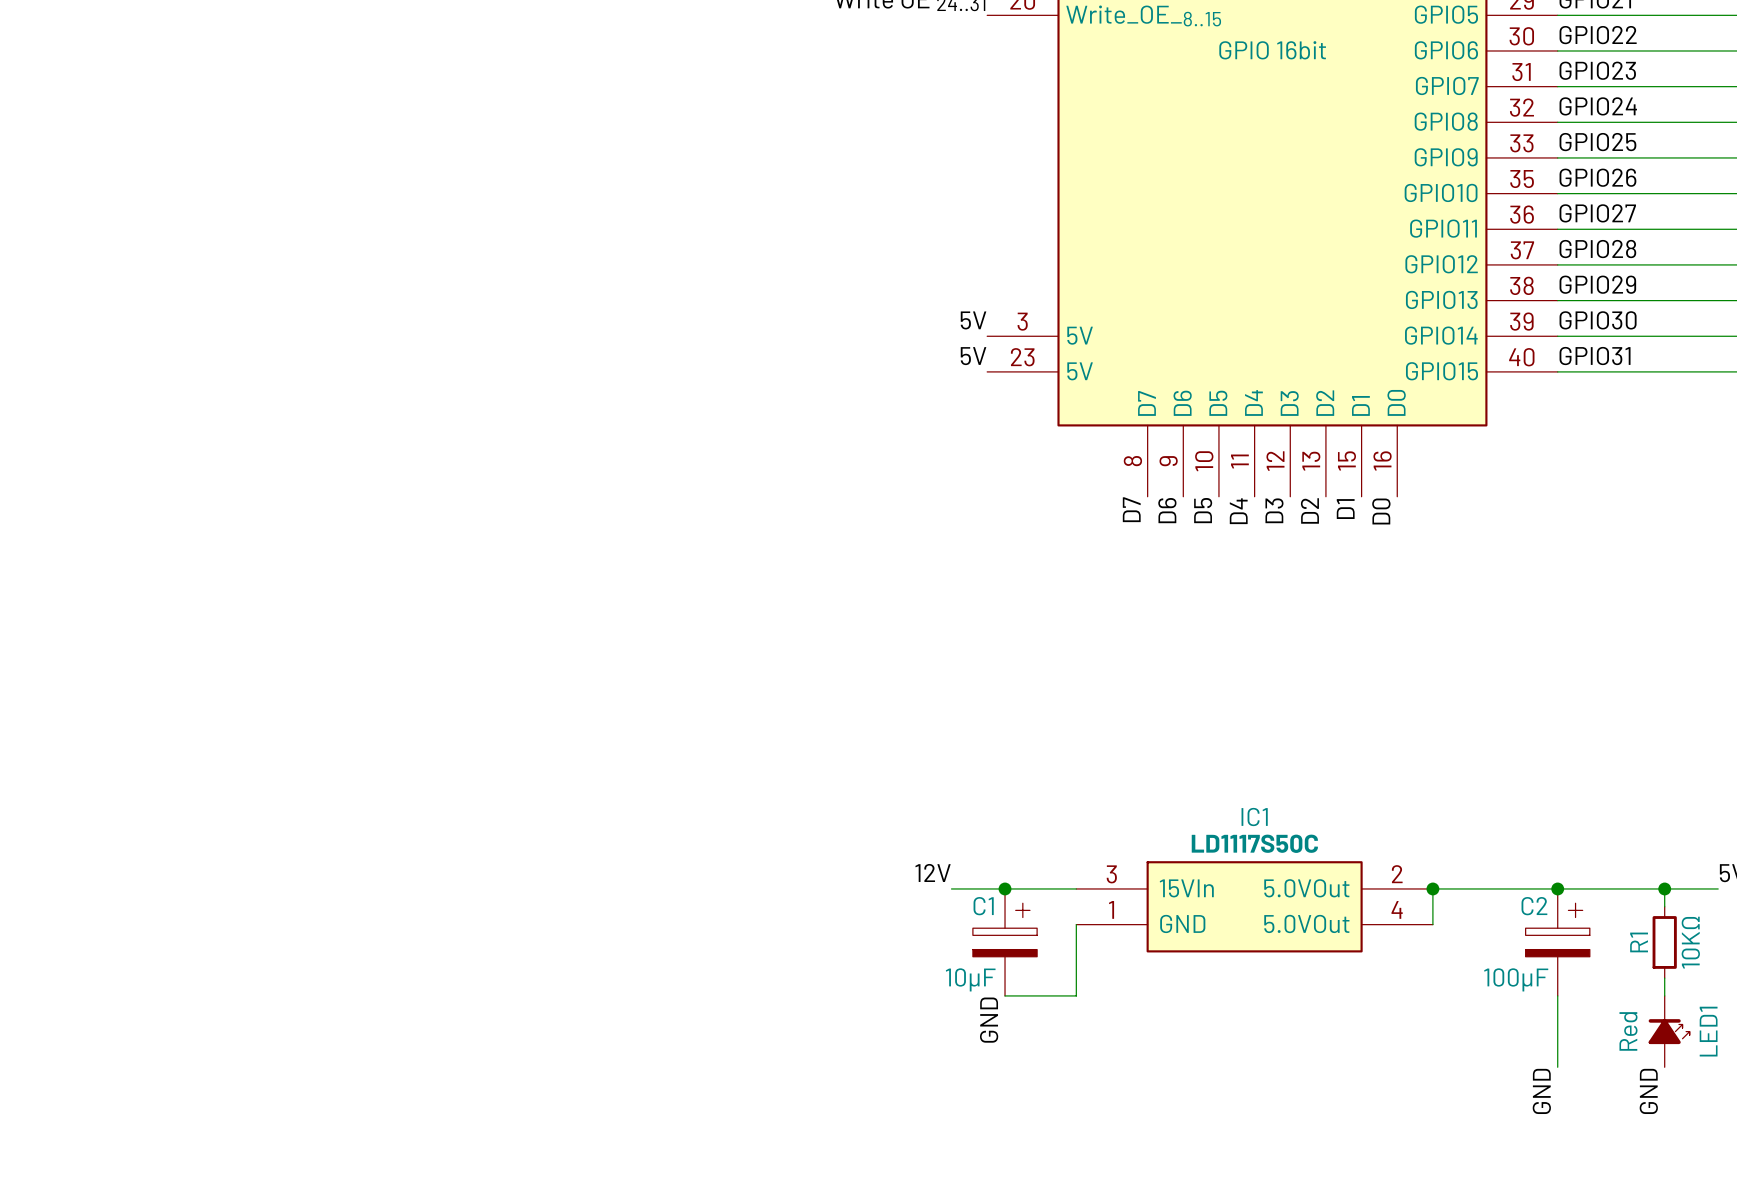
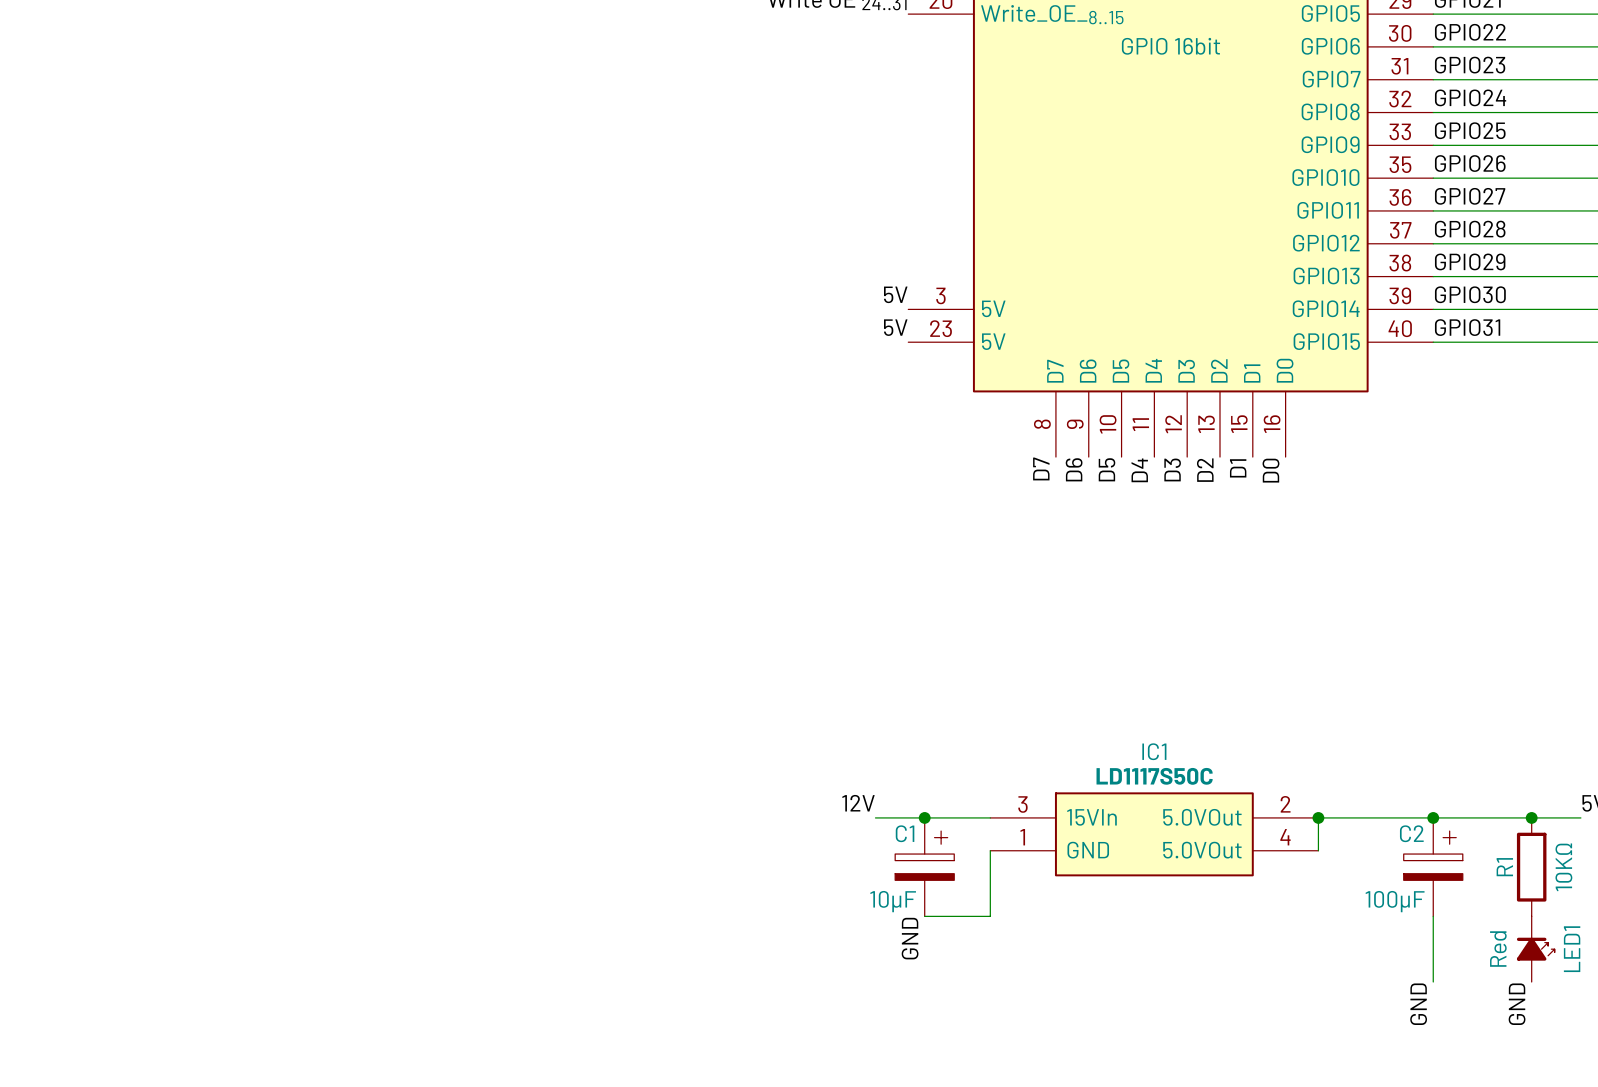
R1 symbol: [1652, 906, 1677, 979] -> [1516, 817, 1547, 917]

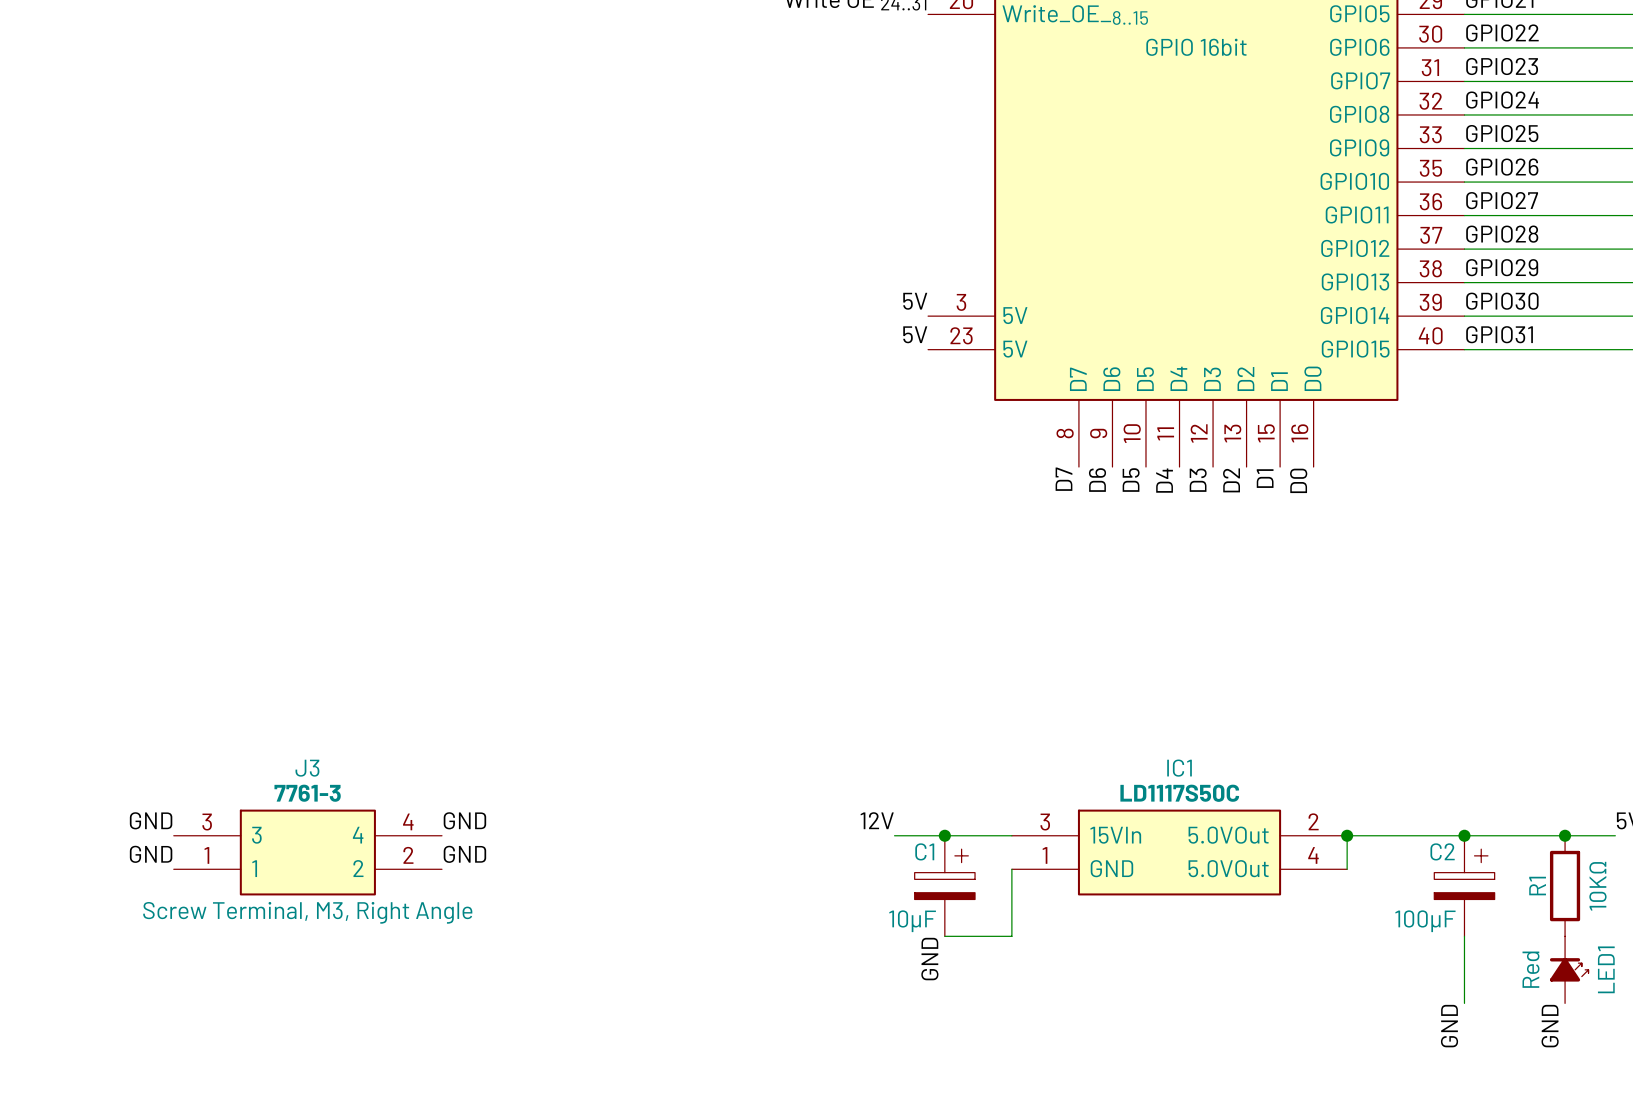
label: none -> GND (151, 820)
label: none -> GND (464, 820)
J3: none -> 7761-3 (307, 852)
label: none -> GND (151, 854)
label: none -> GND (464, 854)

